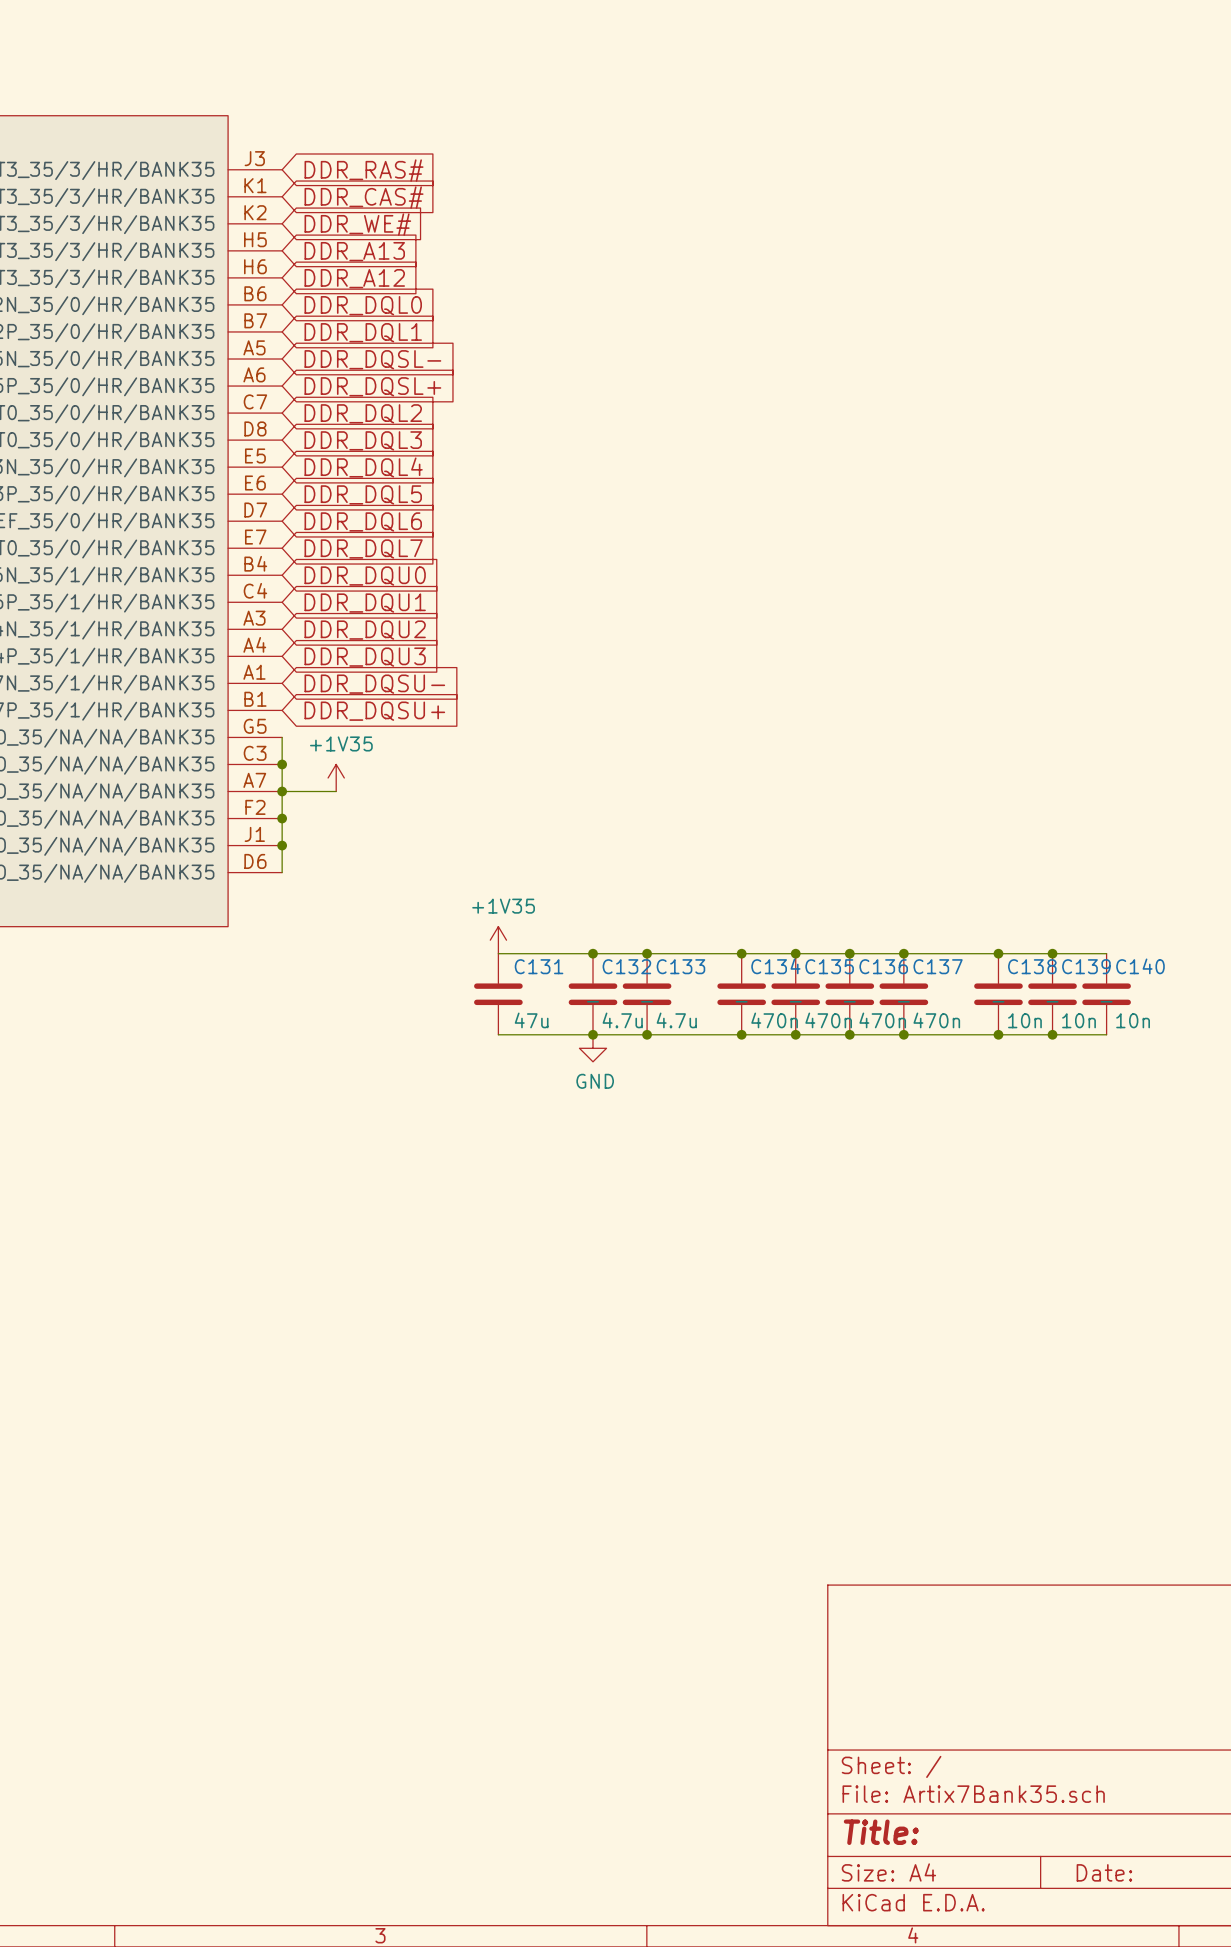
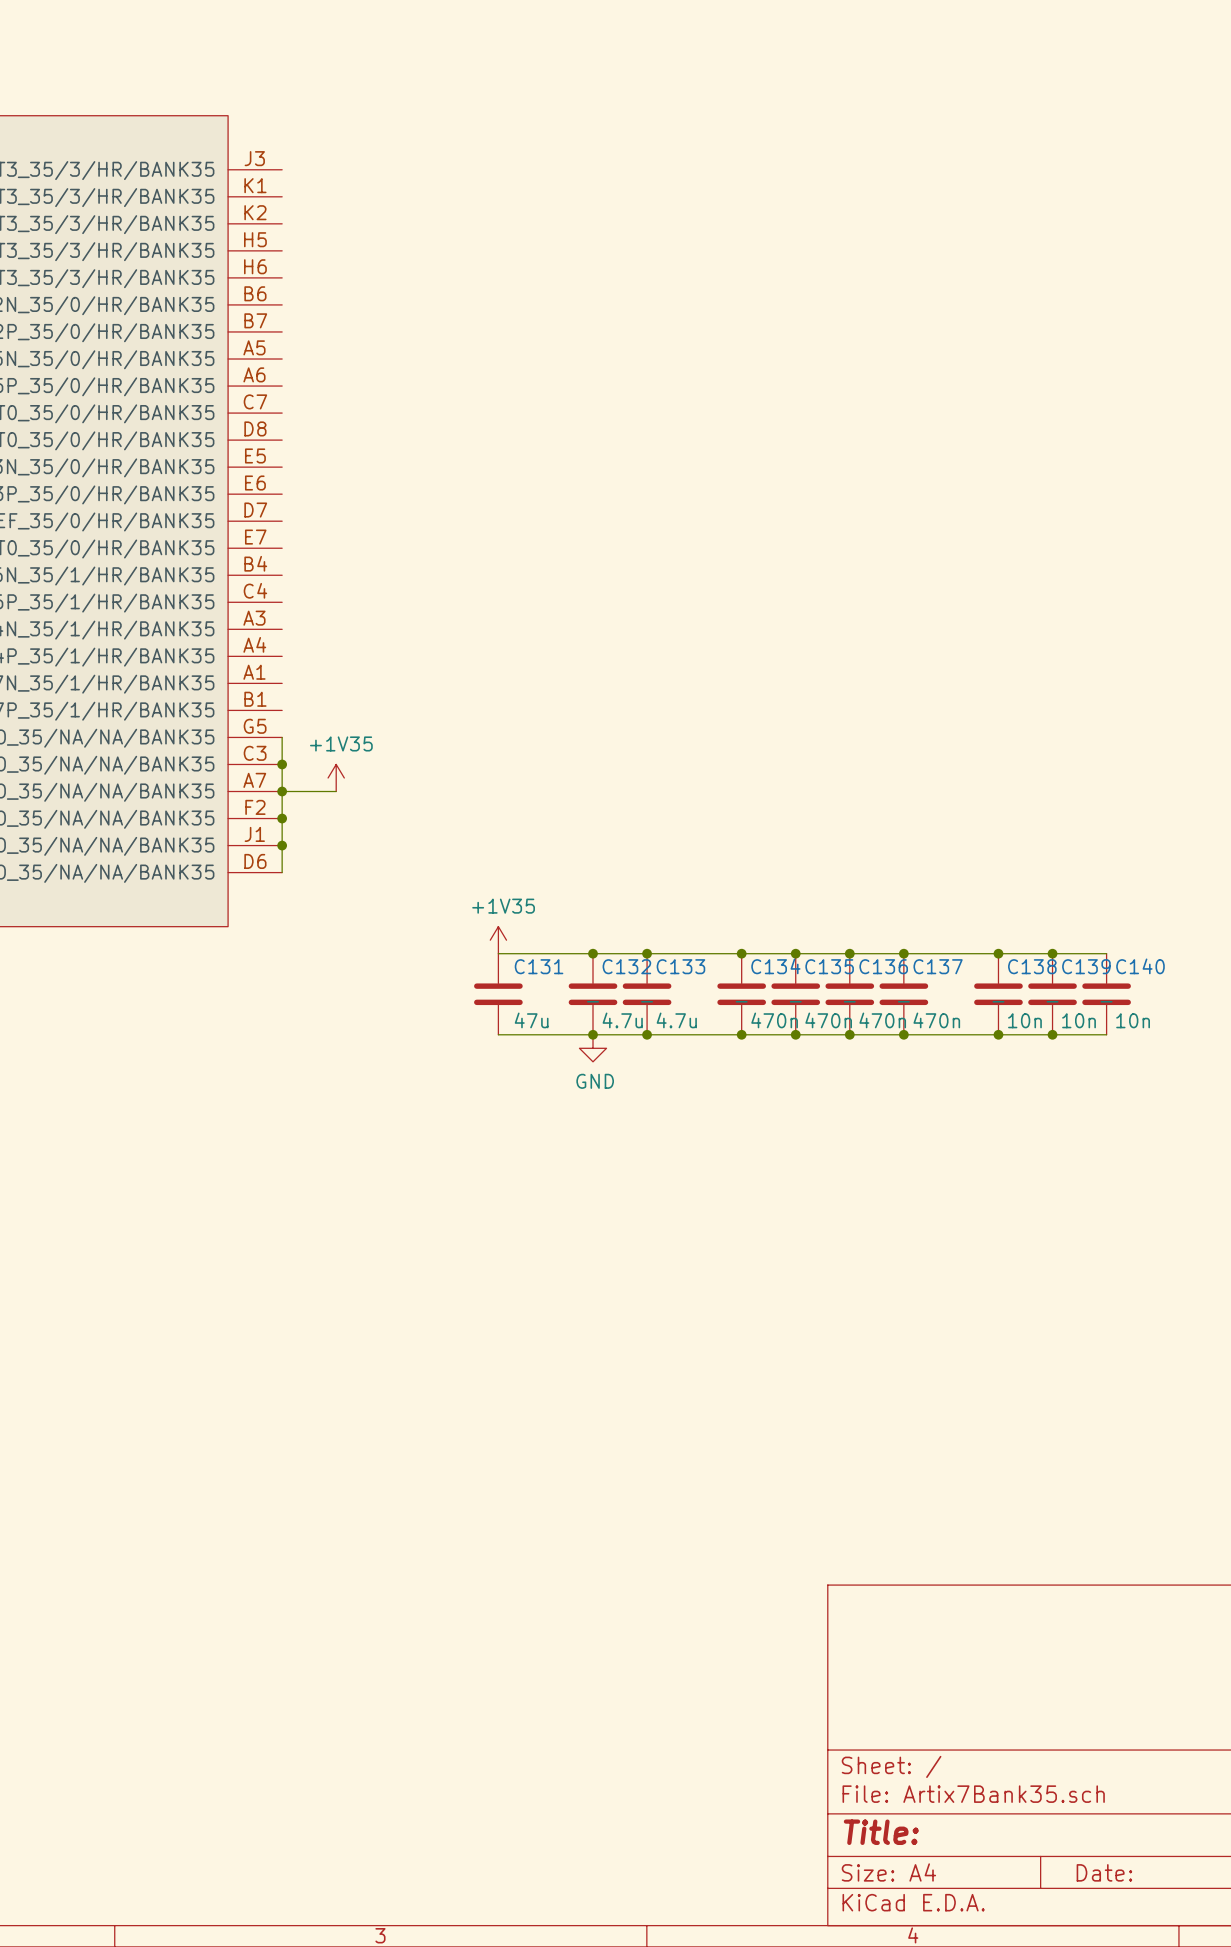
global label: DDR_RAS# (364, 170) -> none
global label: DDR_CAS# (364, 197) -> none
global label: DDR_WE# (357, 224) -> none
global label: DDR_A13 (354, 251) -> none
global label: DDR_A12 (354, 278) -> none
global label: DDR_DQL0 (363, 305) -> none
global label: DDR_DQL1 (363, 332) -> none
global label: DDR_DQSL- (372, 359) -> none
global label: DDR_DQSL+ (372, 386) -> none
global label: DDR_DQL2 (363, 413) -> none
global label: DDR_DQL3 (363, 440) -> none
global label: DDR_DQL4 (363, 467) -> none
global label: DDR_DQL5 (363, 494) -> none
global label: DDR_DQL6 (363, 521) -> none
global label: DDR_DQL7 (363, 548) -> none
global label: DDR_DQU0 (365, 576) -> none
global label: DDR_DQU1 (365, 603) -> none
global label: DDR_DQU2 (365, 630) -> none
global label: DDR_DQU3 (365, 657) -> none
global label: DDR_DQSU- (374, 684) -> none
global label: DDR_DQSU+ (374, 711) -> none

